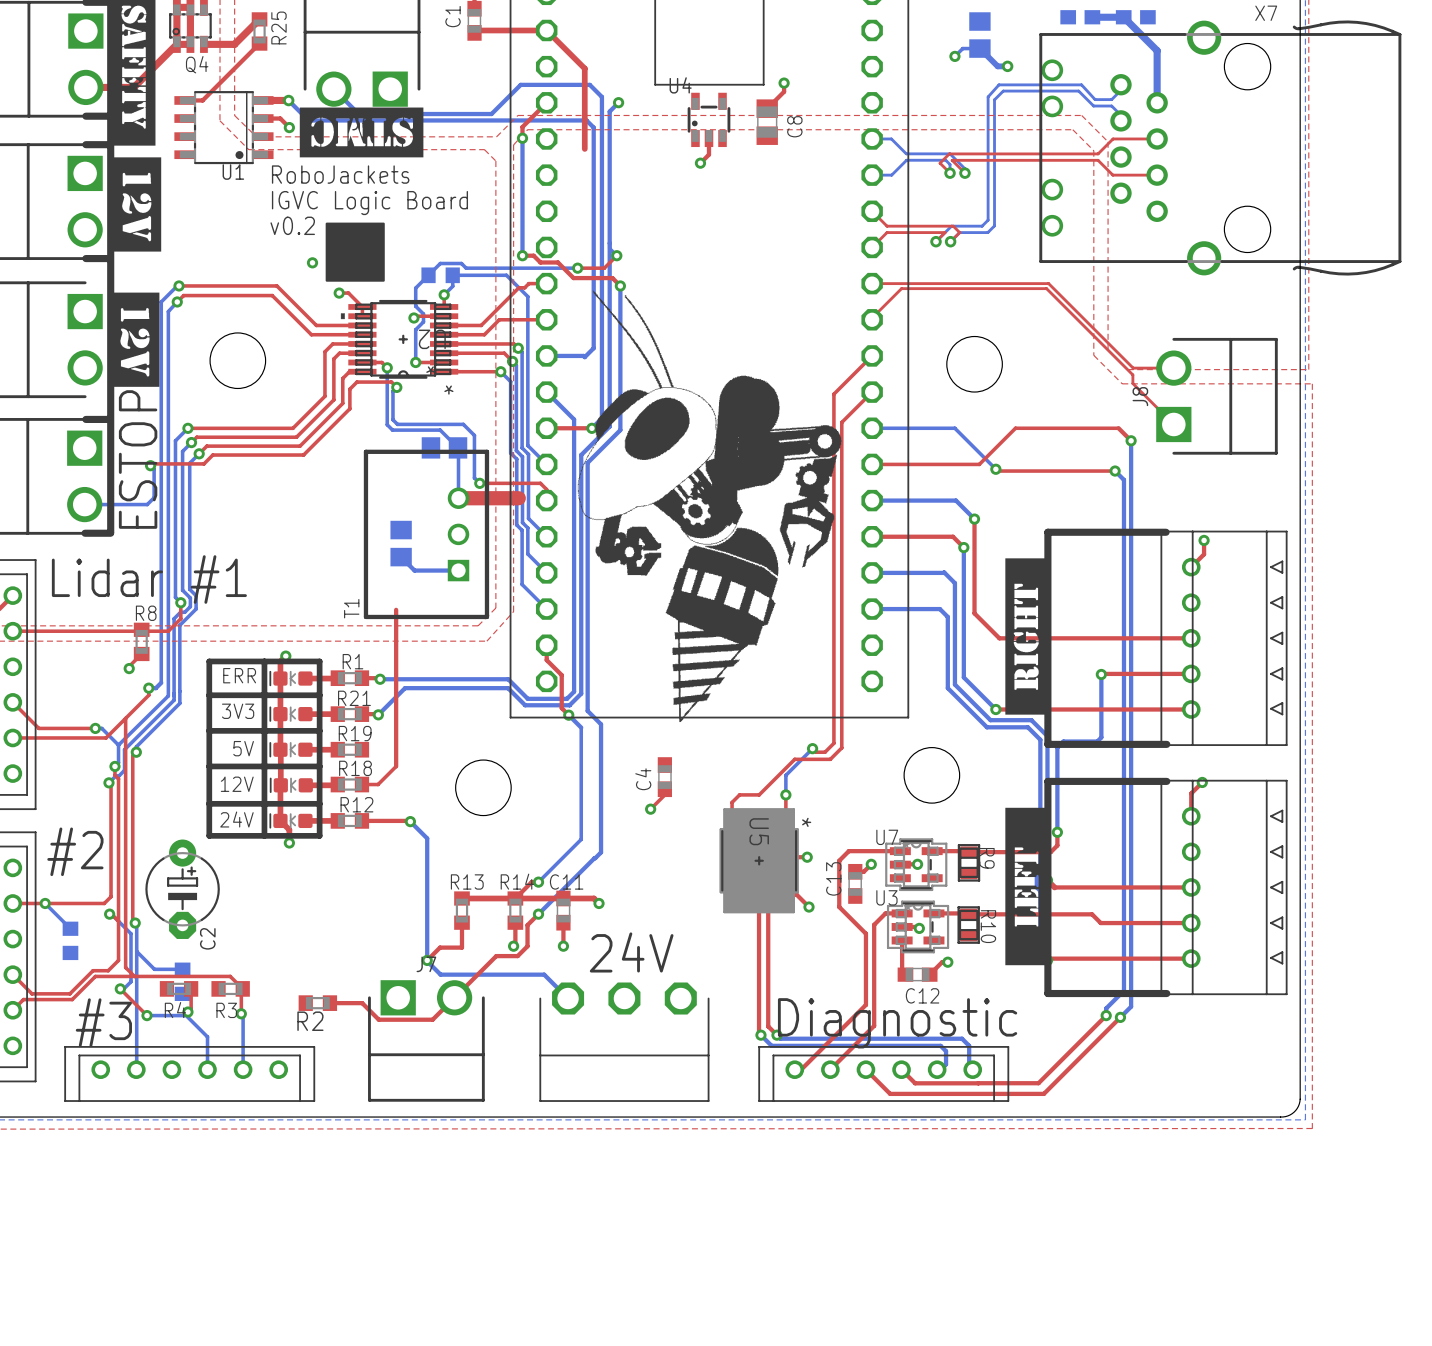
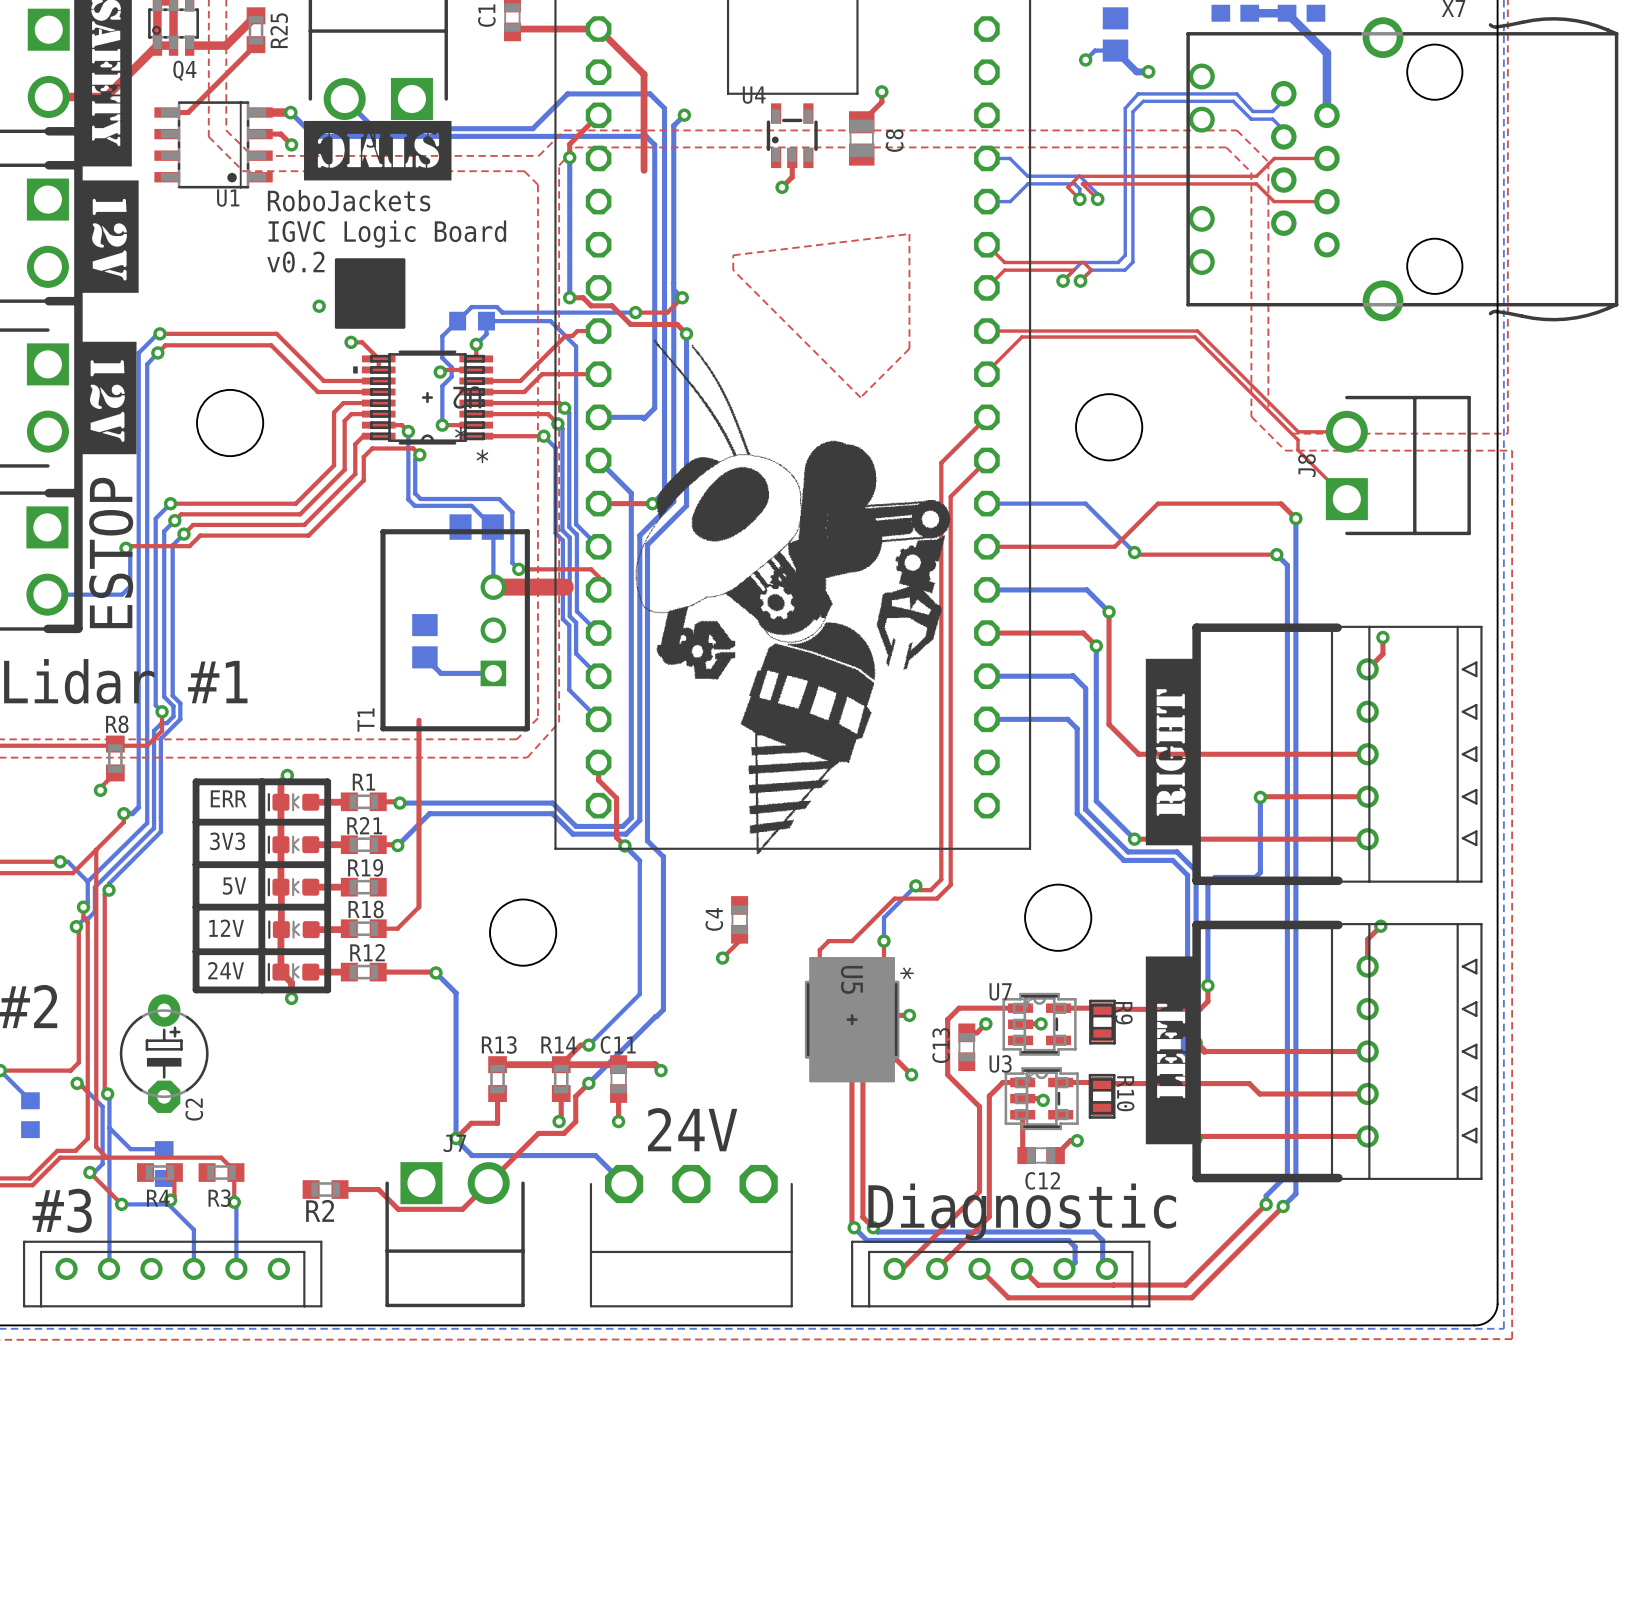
top zone outline: none -> (909, 234) (733, 255) (733, 270) (860, 397) (909, 348) (909, 234)

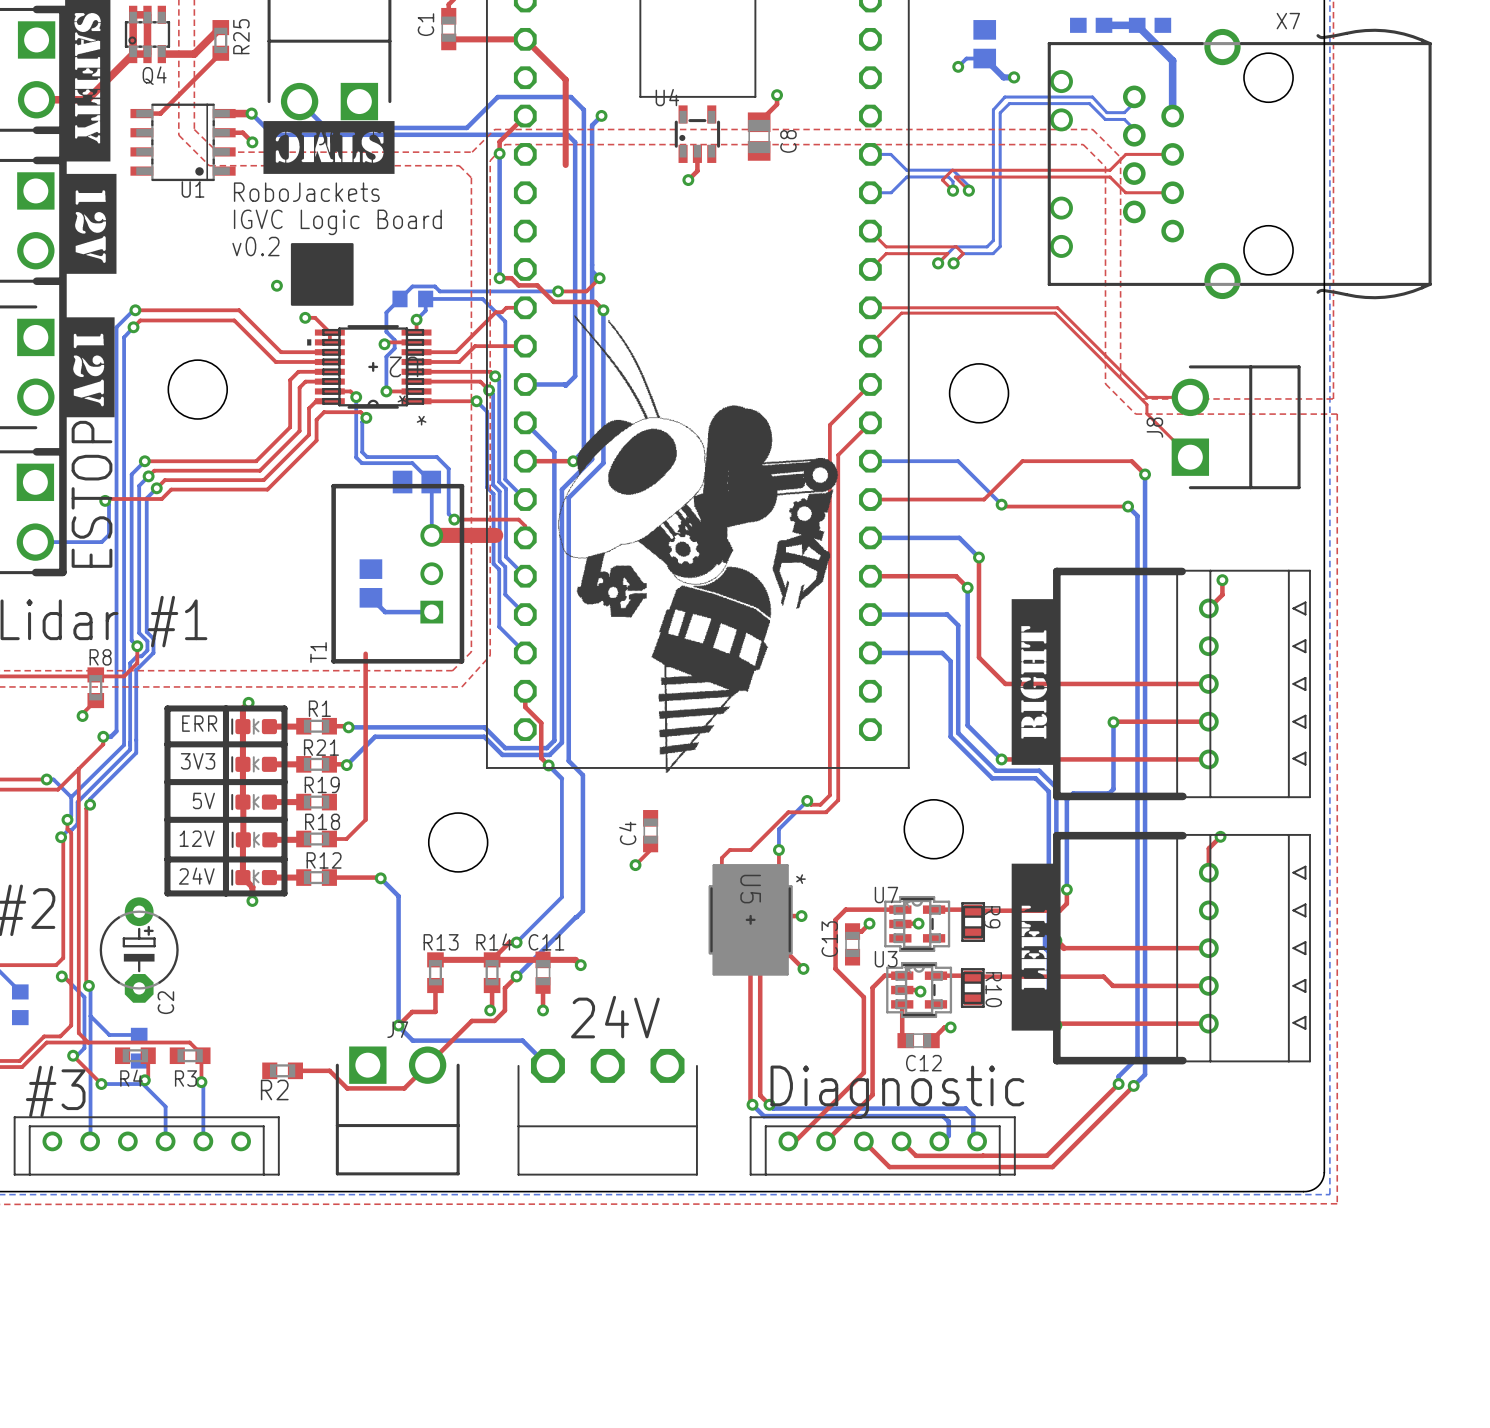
top zone outline: (909, 234) (733, 255) (733, 270) (860, 397) (909, 348) (909, 234) -> none

